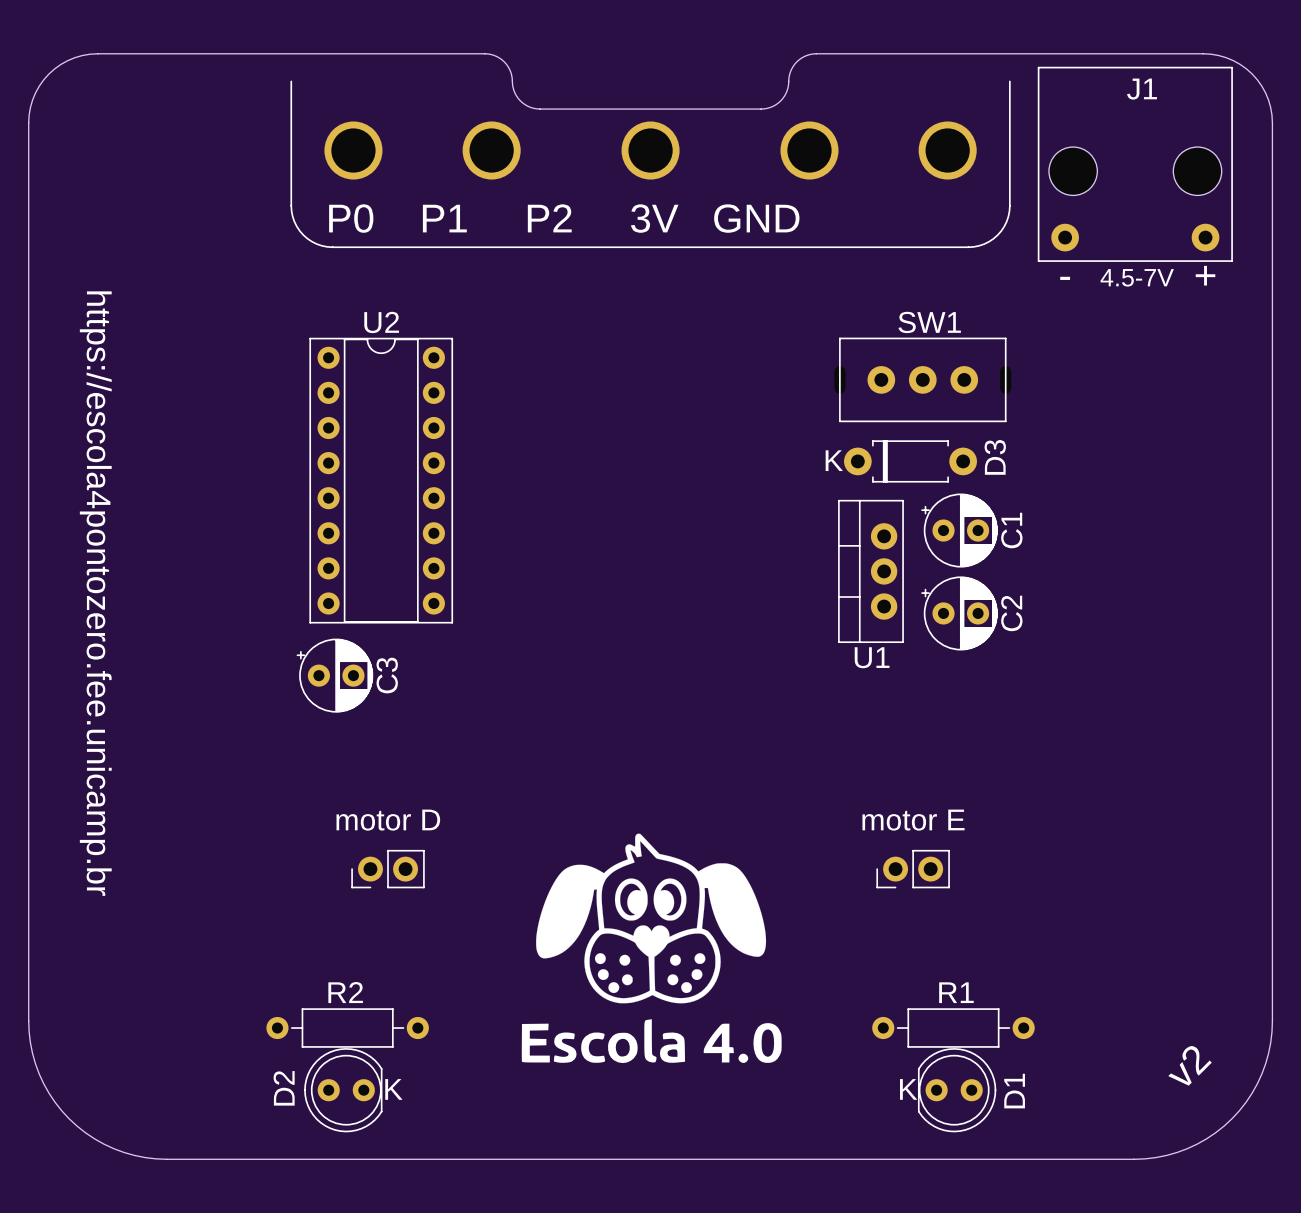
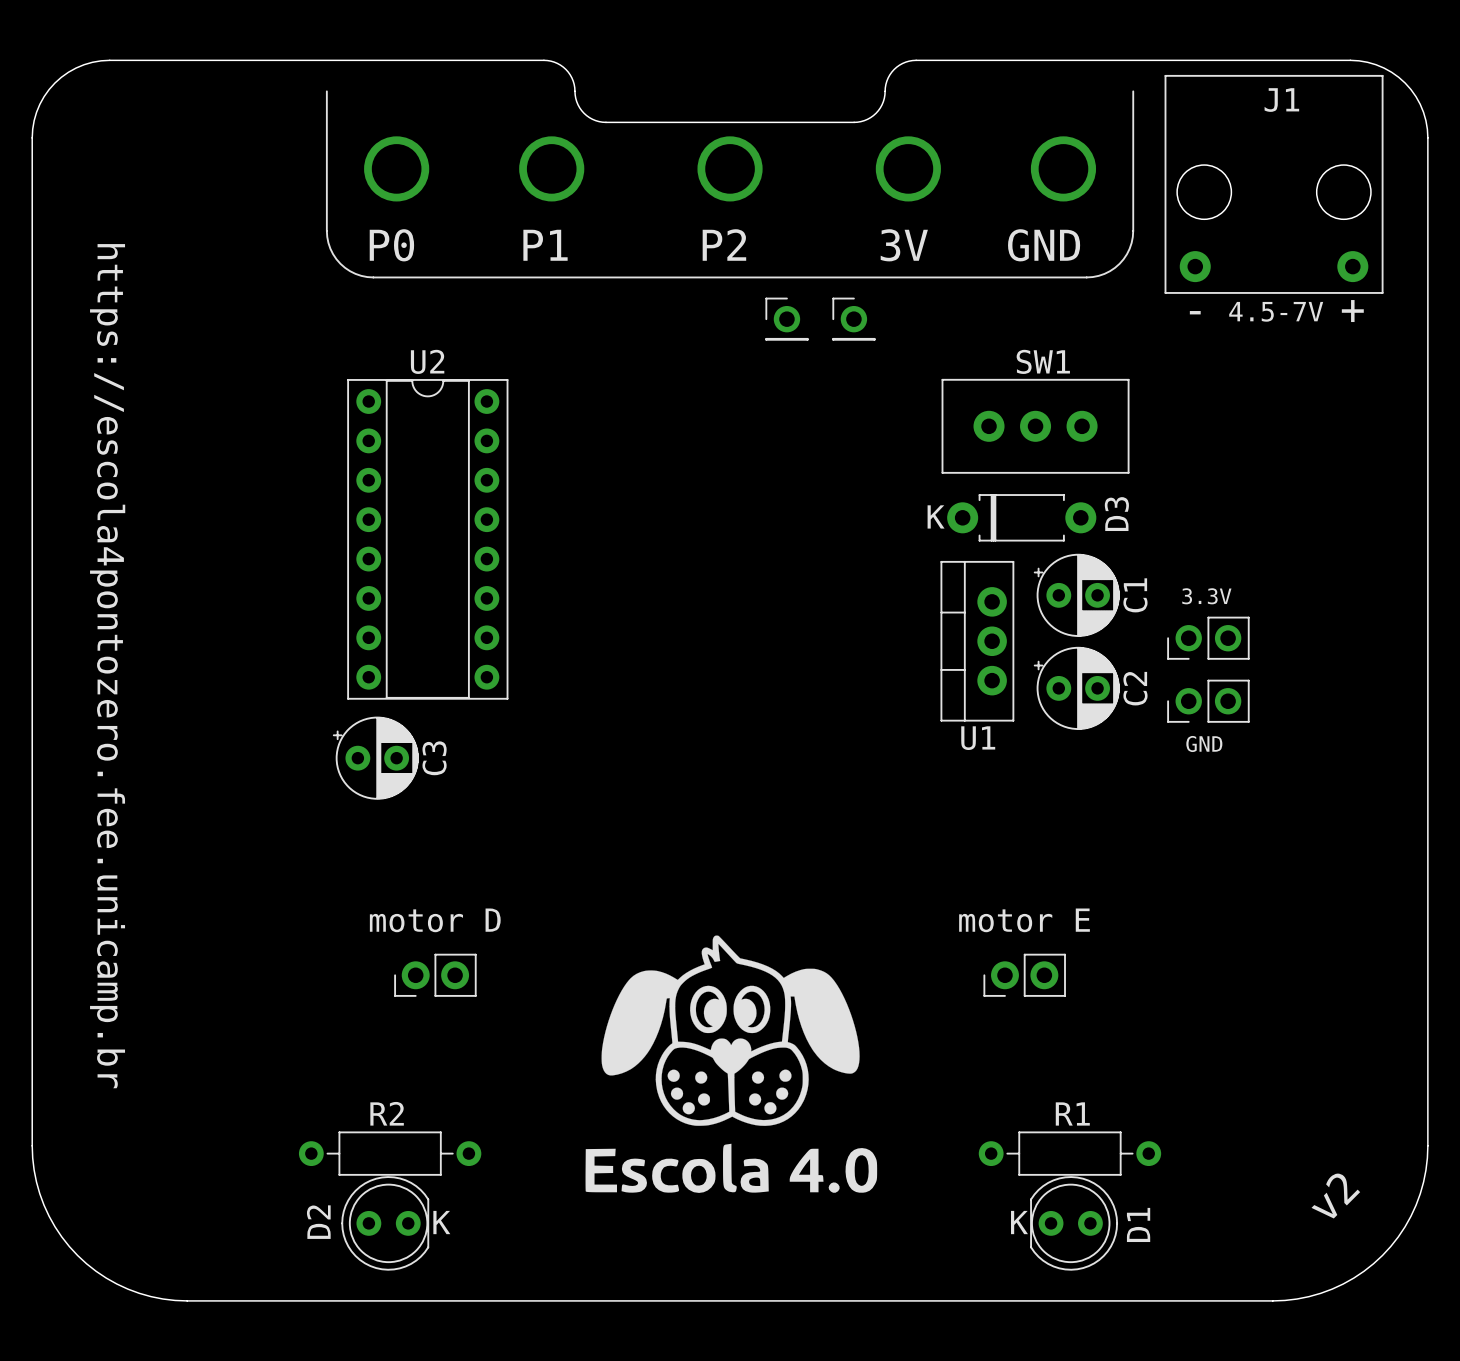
part: none -> (786, 319)
part: none -> (853, 319)
part: none -> (1208, 638)
part: none -> (1208, 701)

